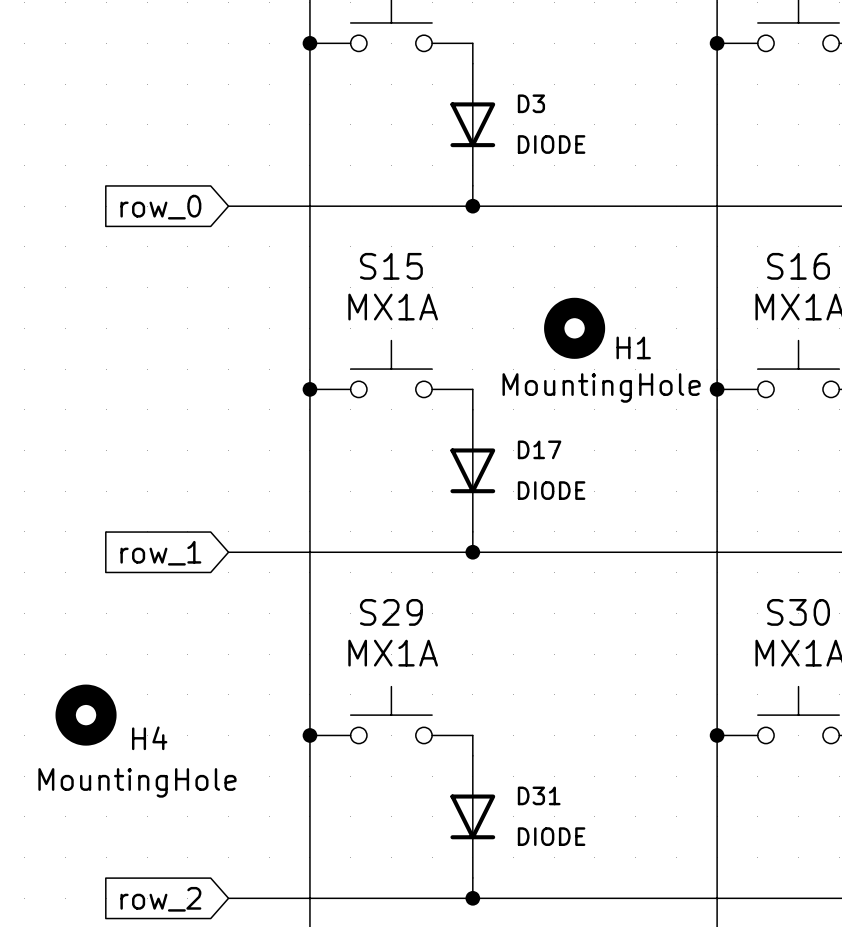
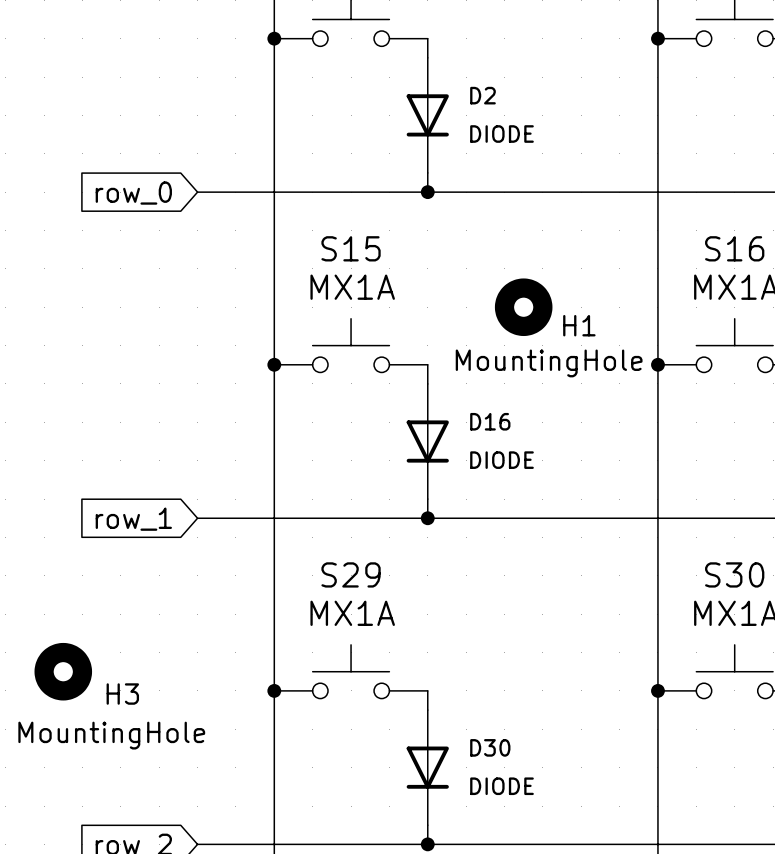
D3 name: D3 (531, 103) -> D2 (482, 95)
D17 name: D17 (539, 449) -> D16 (490, 421)
H4 name: H4 (149, 738) -> H3 (122, 694)
D31 name: D31 (539, 795) -> D30 (490, 747)

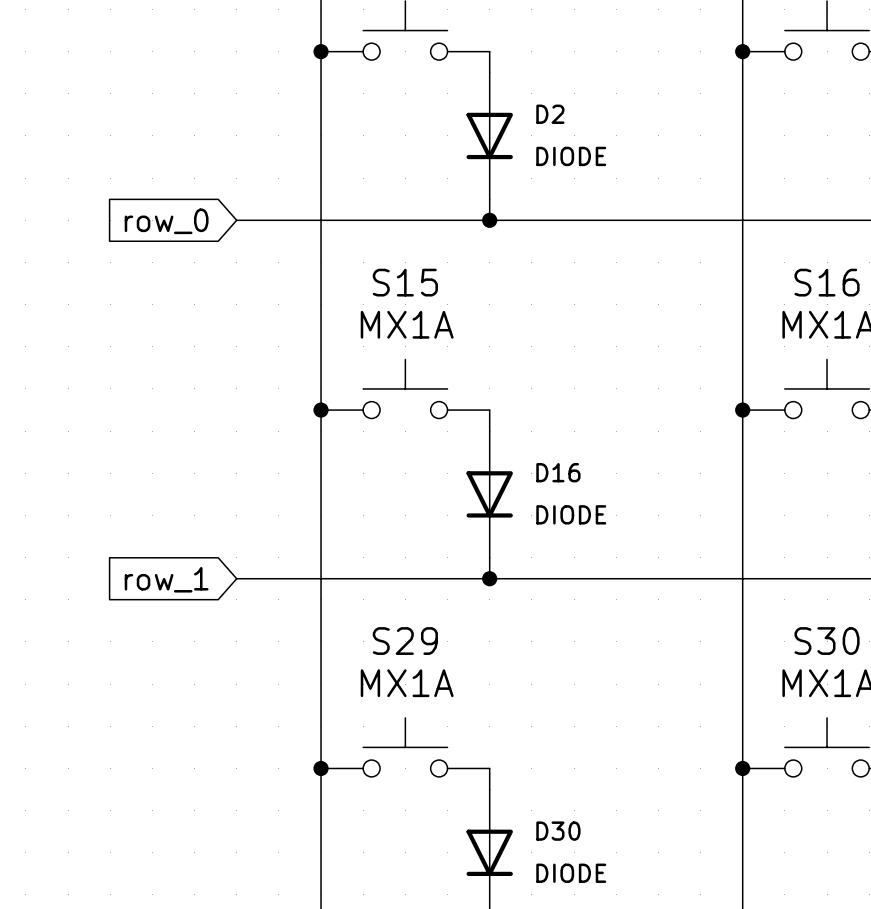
H1: MountingHole (523, 307) -> none
H3: MountingHole (63, 671) -> none

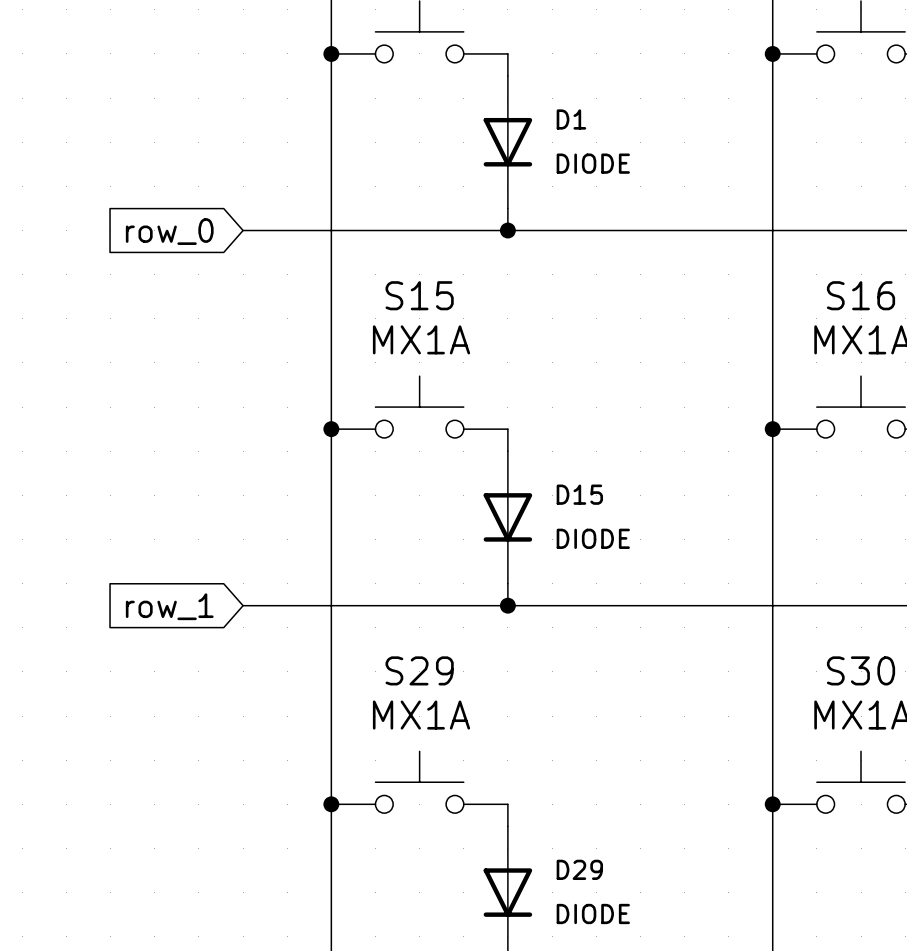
D2 name: D2 (550, 114) -> D1 (571, 119)
D16 name: D16 (558, 472) -> D15 (579, 494)
D30 name: D30 (558, 831) -> D29 (579, 869)

